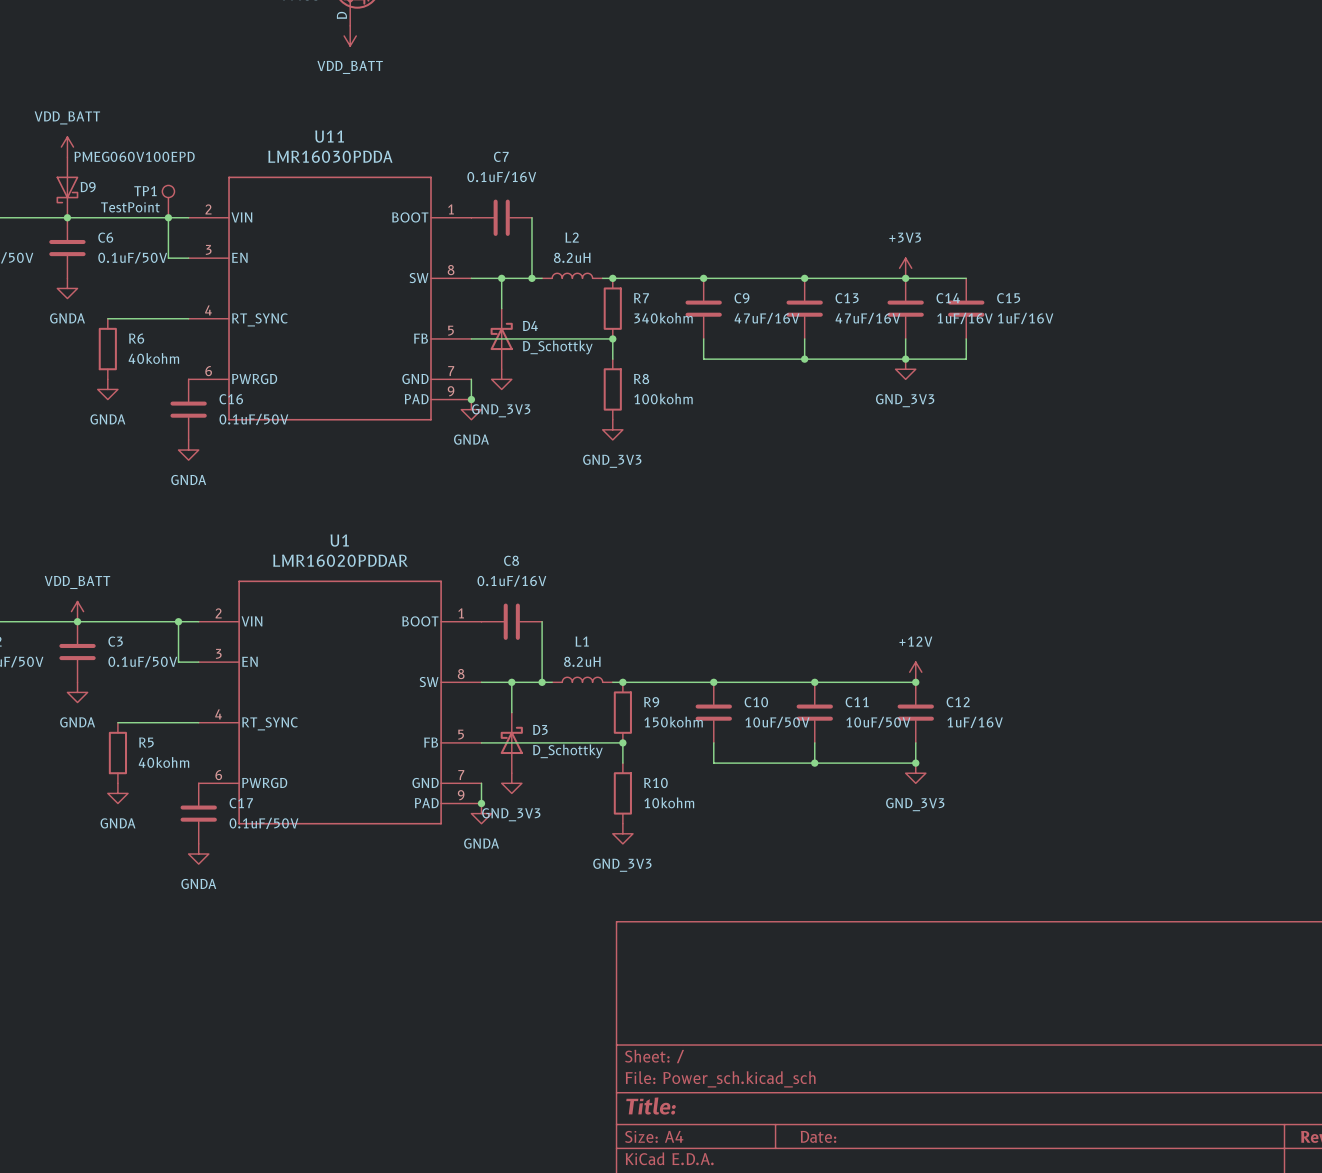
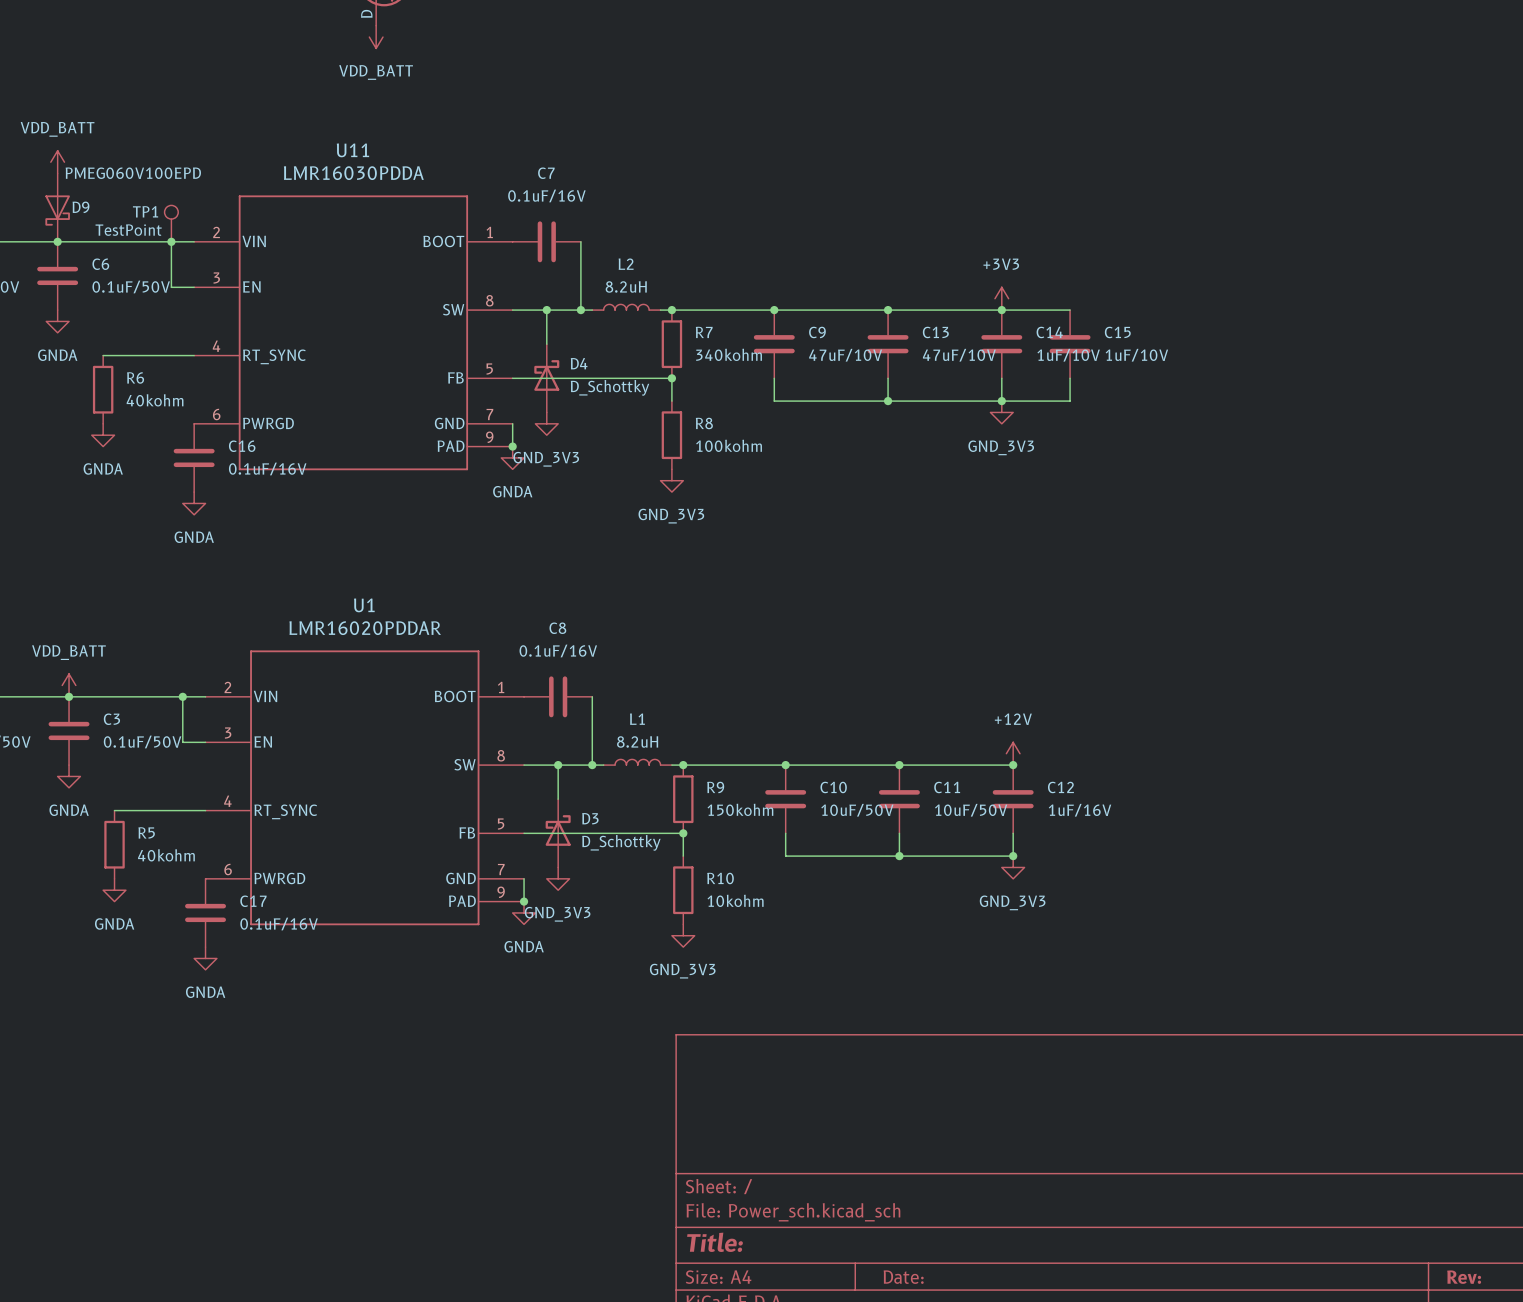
C9 value: 47uF/16V (766, 318) -> 47uF/10V (845, 355)
C13 value: 47uF/16V (867, 318) -> 47uF/10V (959, 355)
C14 value: 1uF/16V (964, 318) -> 1uF/10V (1068, 355)
C15 value: 1uF/16V (1025, 318) -> 1uF/10V (1136, 355)
C16 value: 0.1uF/50V (253, 419) -> 0.1uF/16V (267, 468)
C17 value: 0.1uF/50V (263, 823) -> 0.1uF/16V (279, 923)

